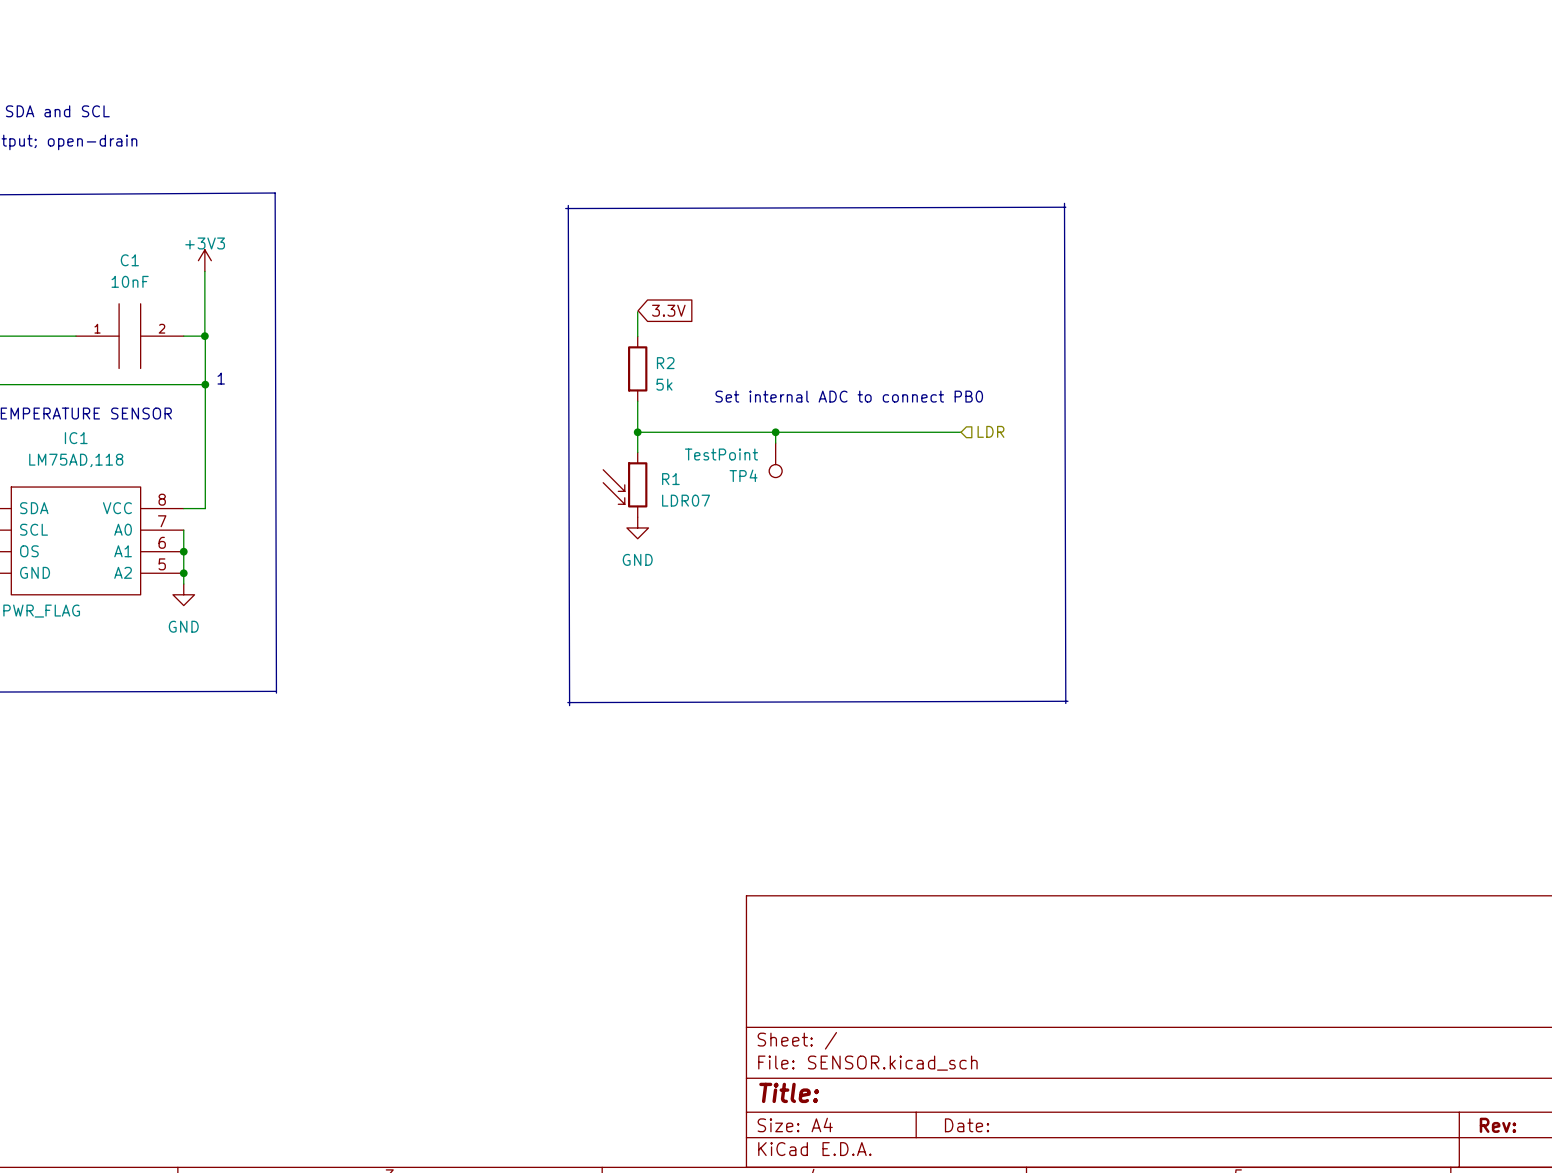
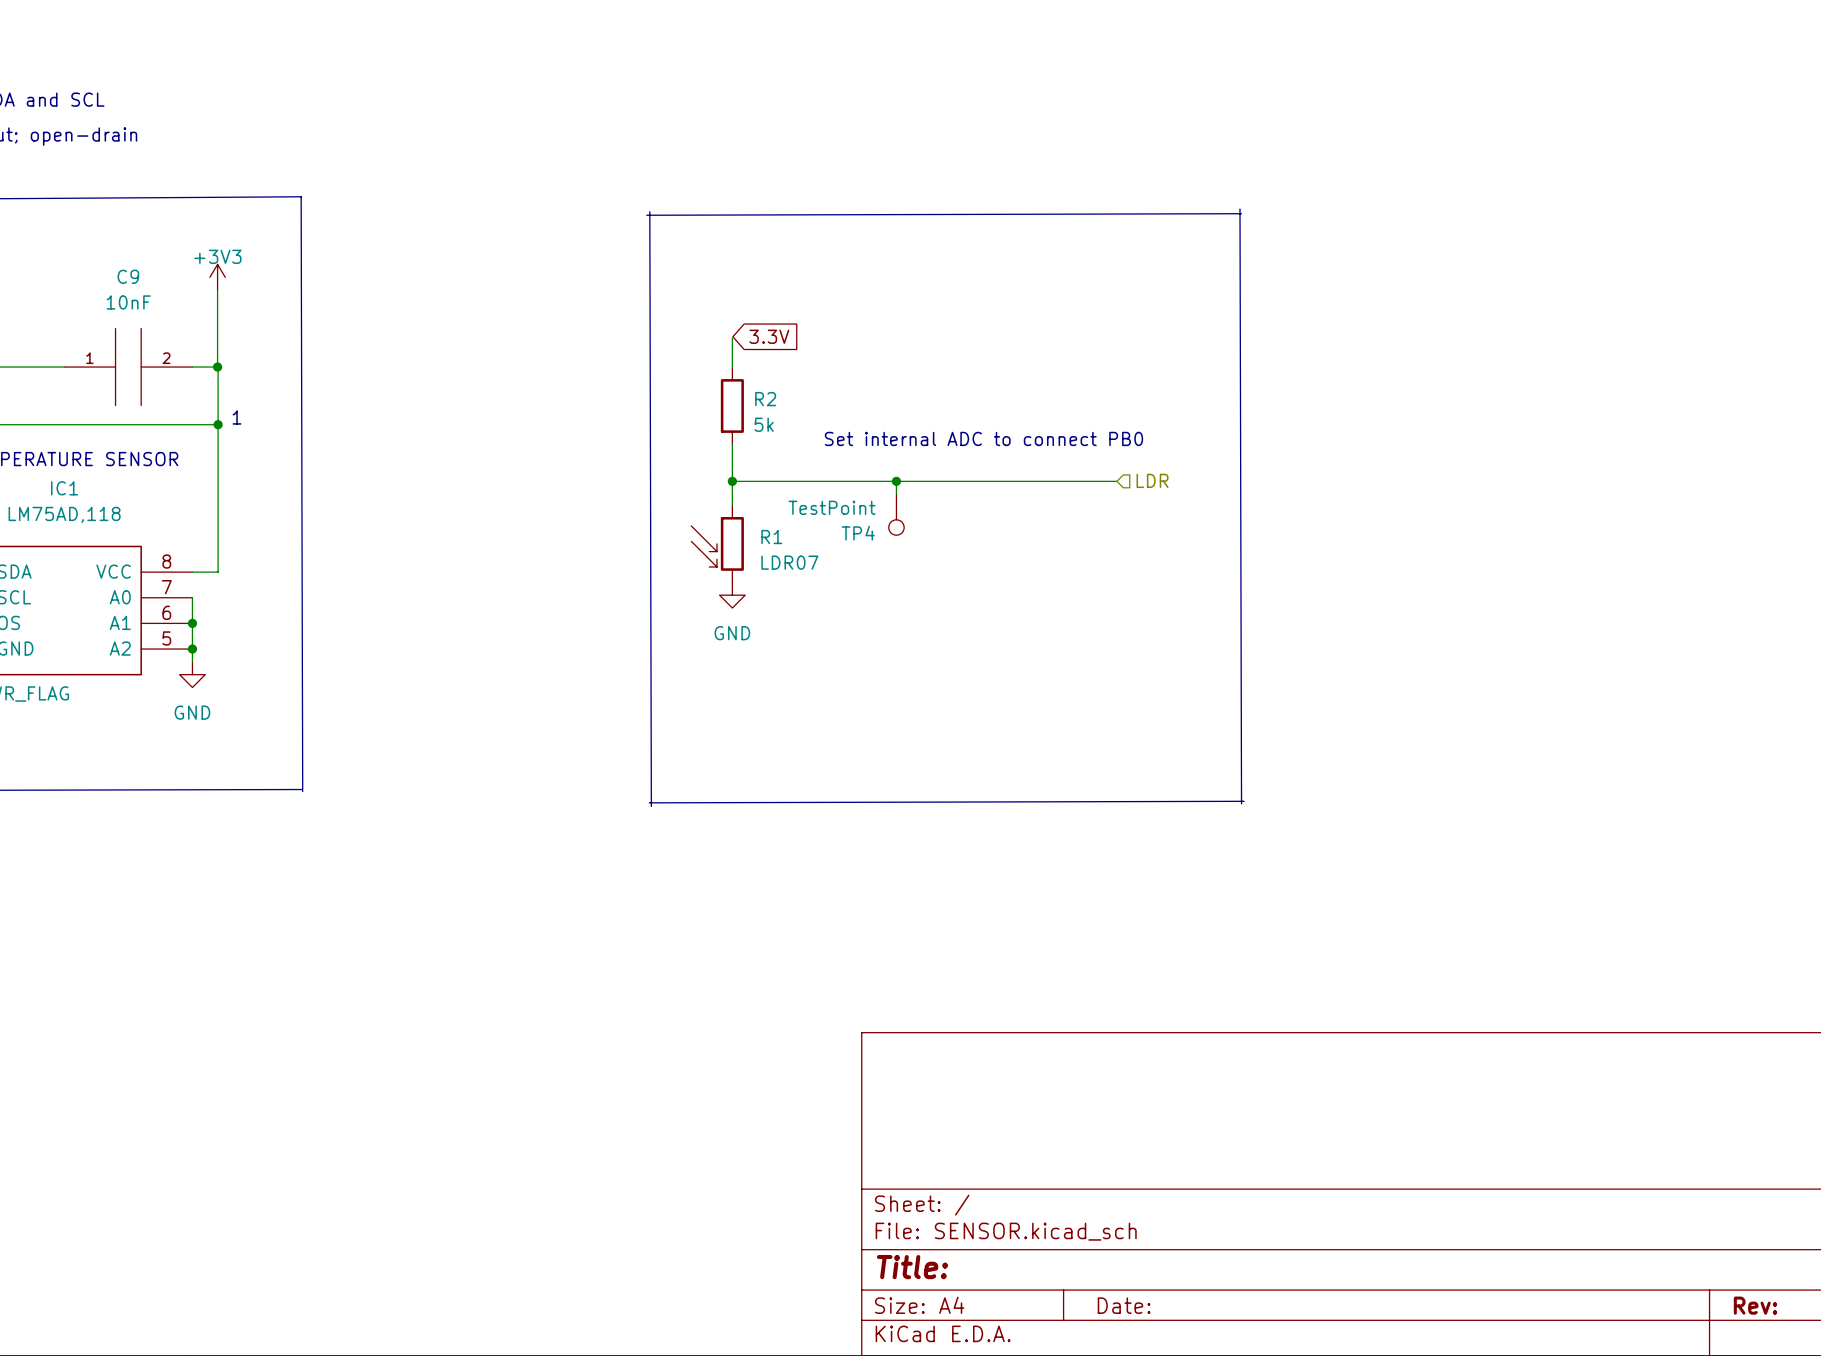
C1 name: C1 (129, 260) -> C9 (128, 276)

